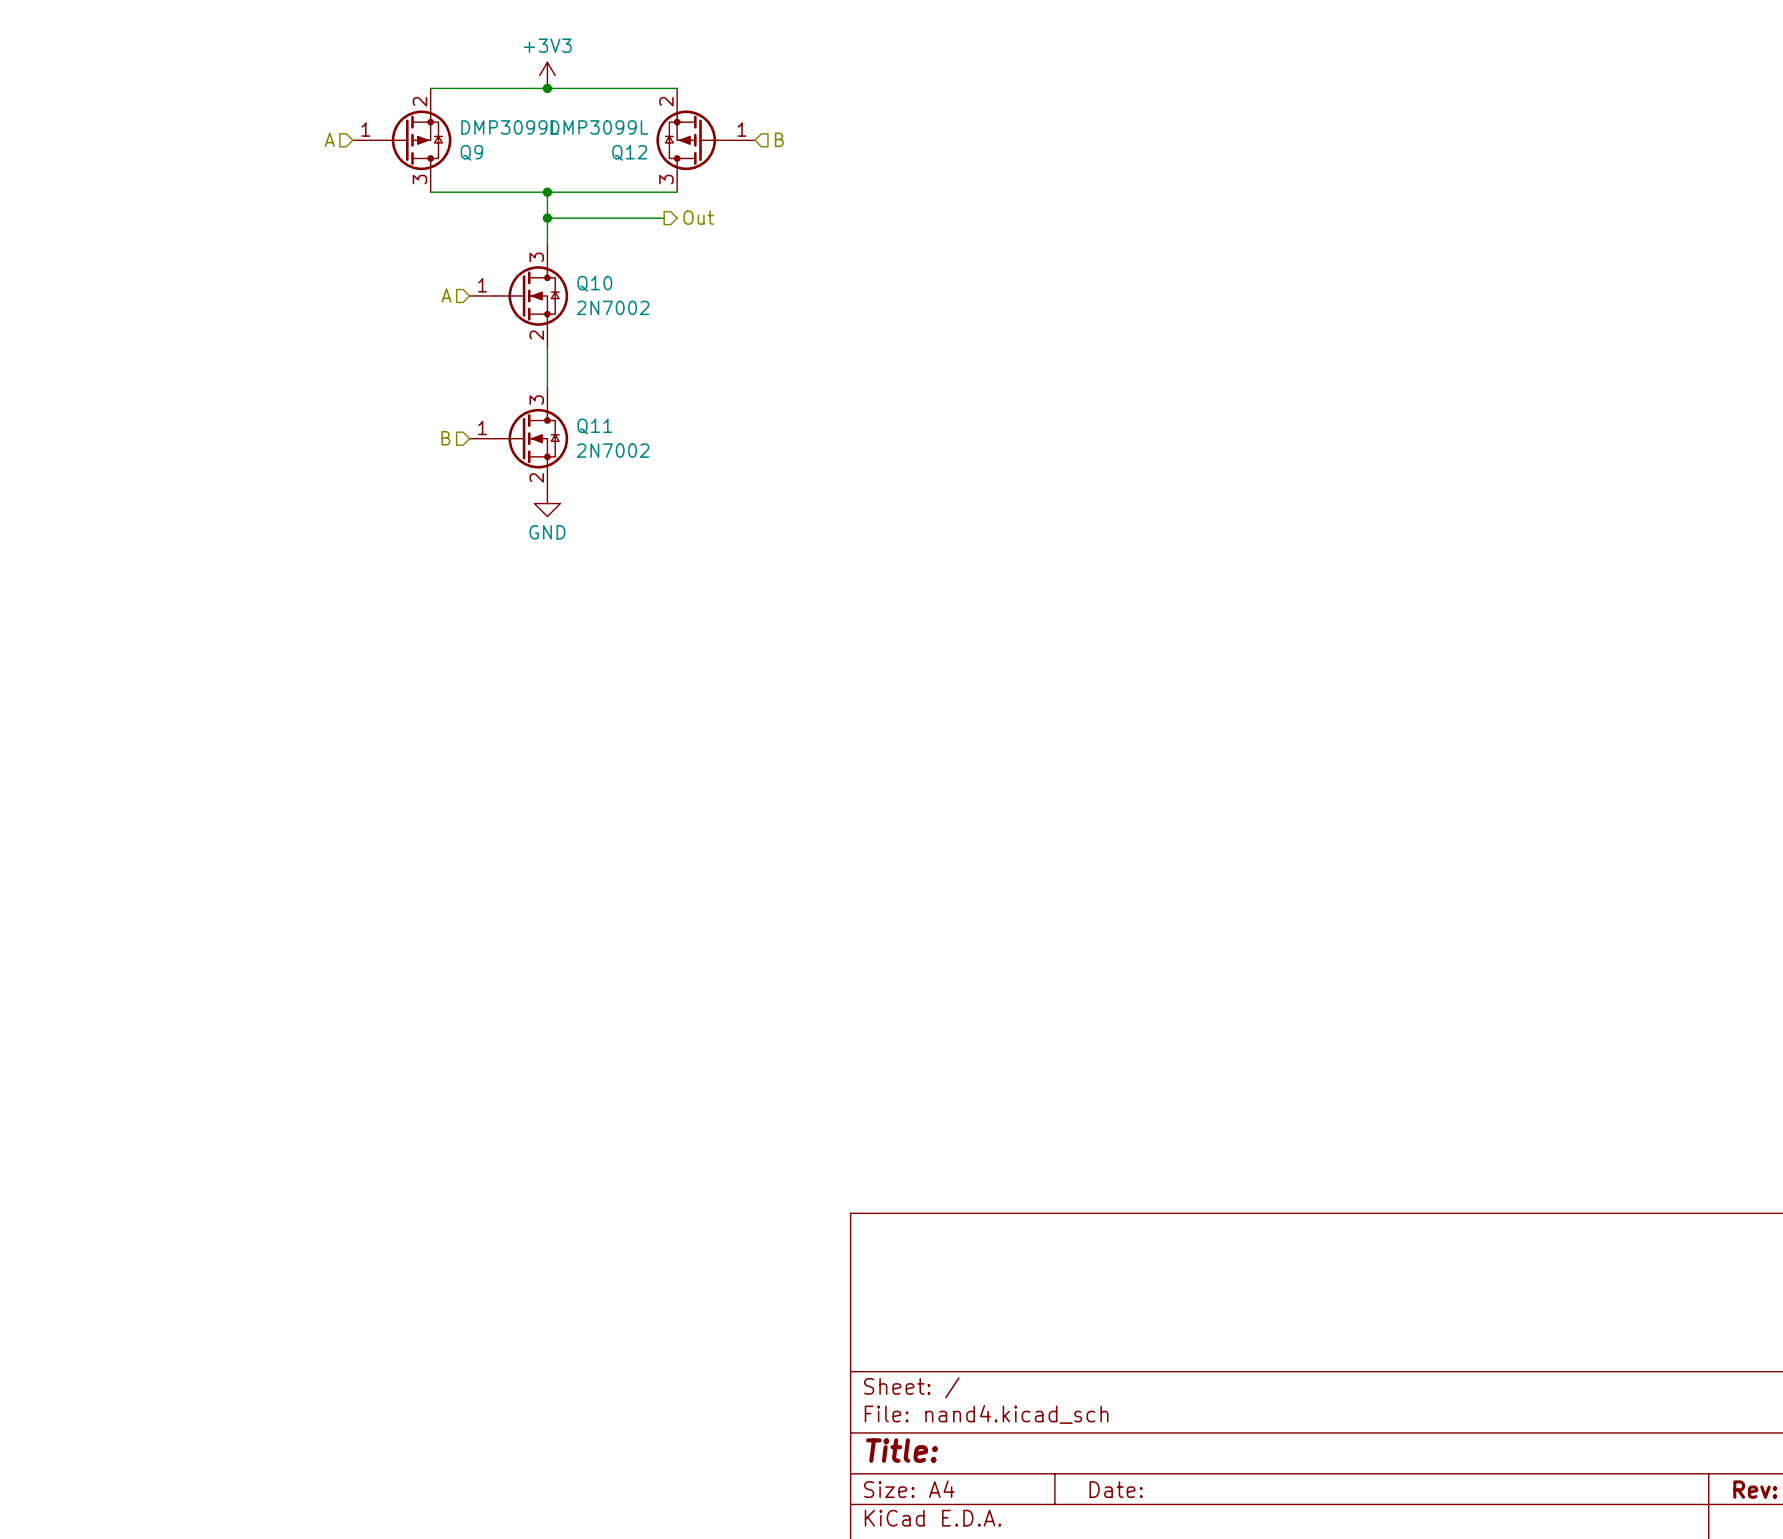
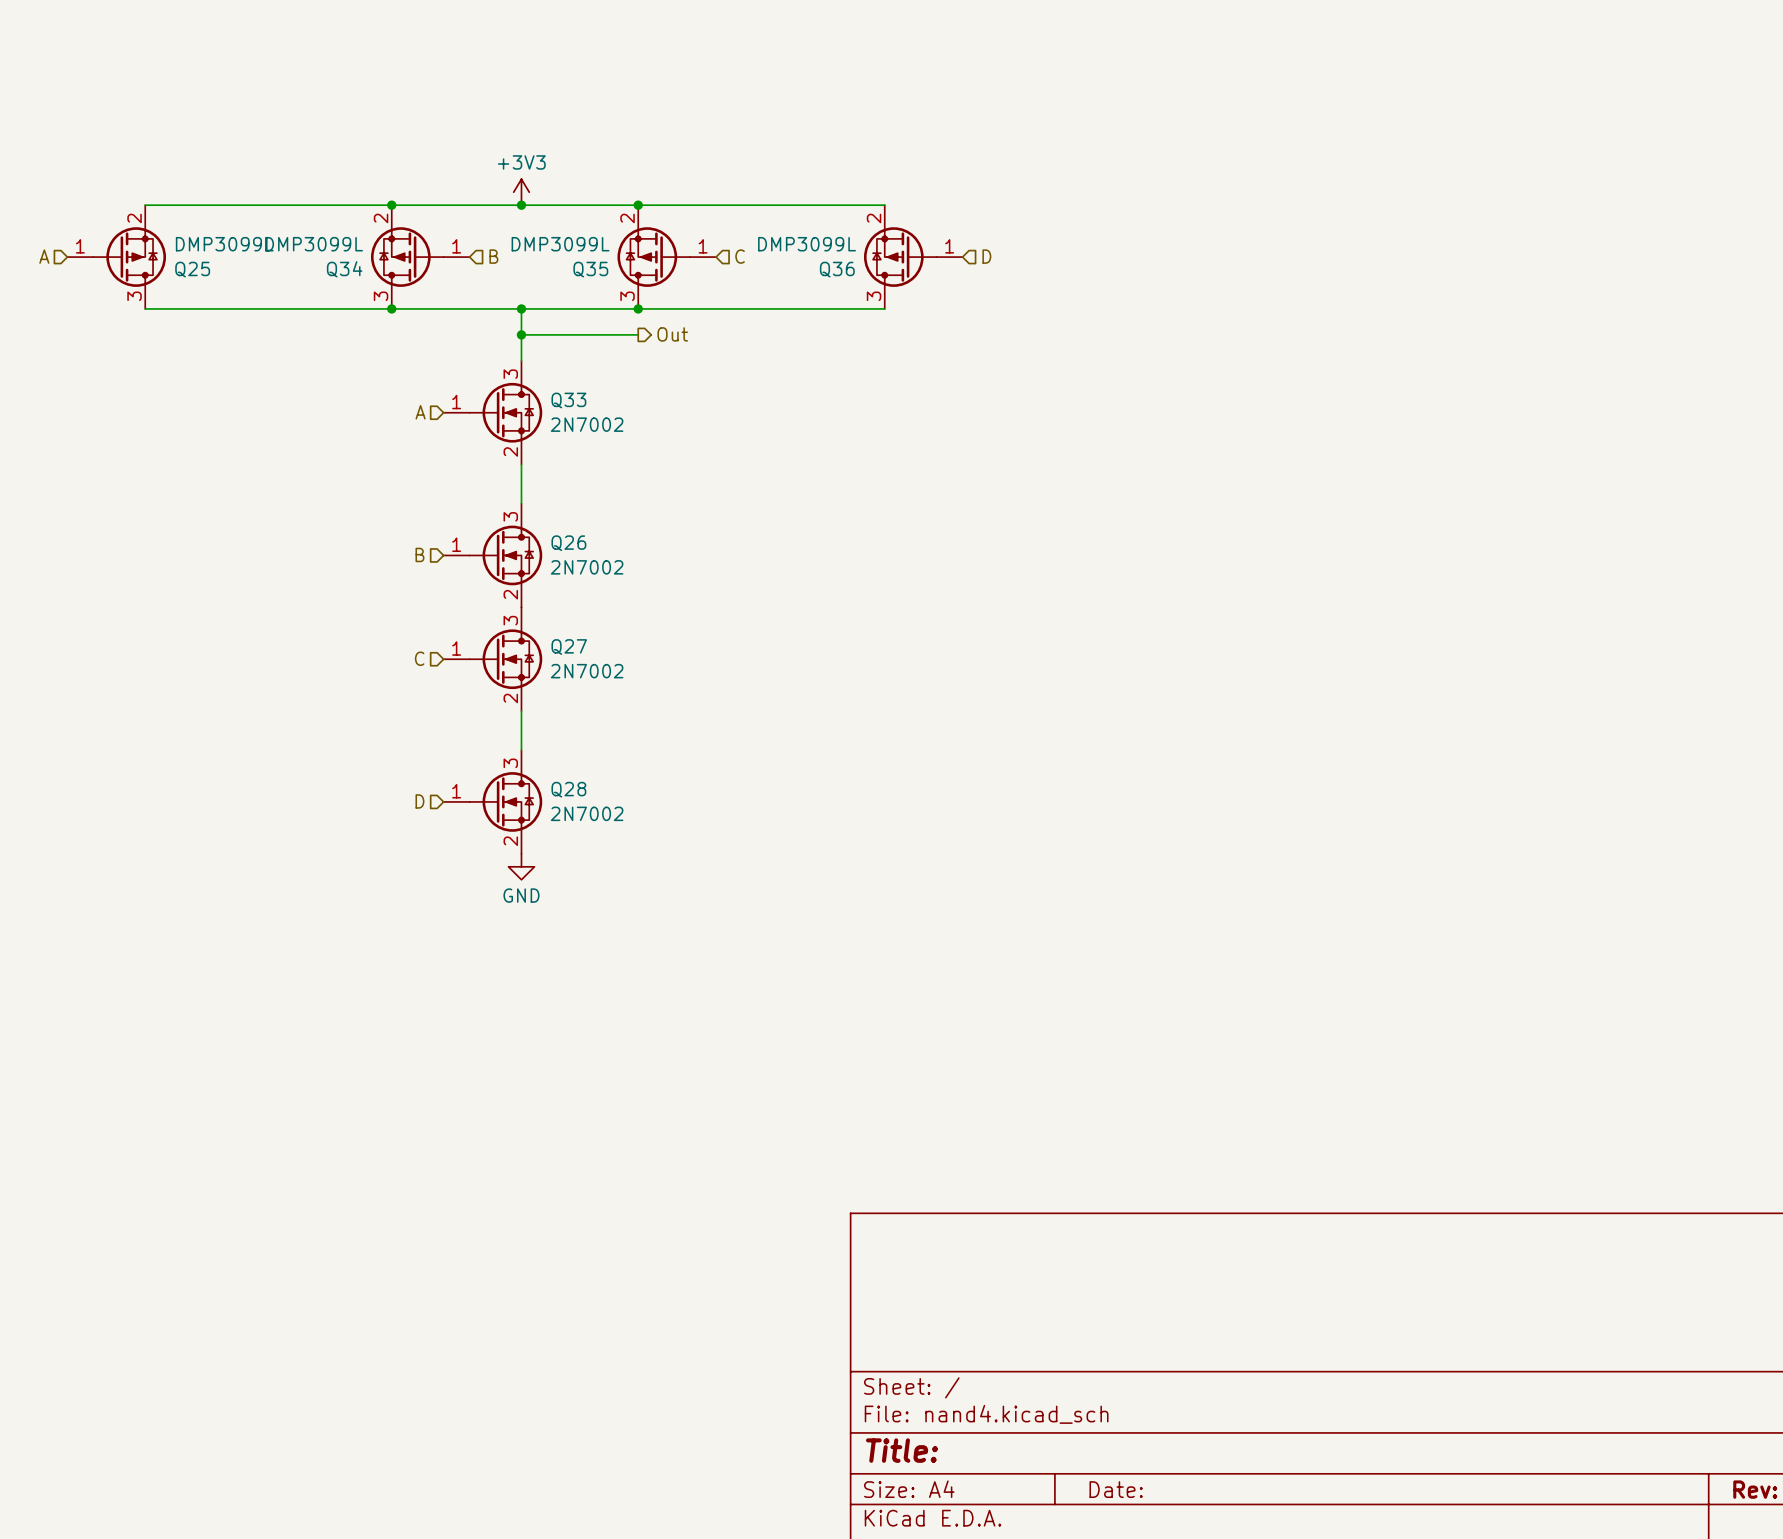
power symbol position: +3V3 (547, 75) -> +3V3 (521, 192)
wire: (430, 88) (677, 88) -> none
junction: (547, 88) -> none
hierarchical label: A (329, 139) -> none
hierarchical label: B (779, 139) -> none
Q9: DMP3099L (402, 140) -> none
Q12: DMP3099L (705, 140) -> none
wire: (430, 192) (677, 192) -> none
wire: (547, 192) (547, 244) -> (521, 308) (521, 360)
junction: (547, 192) -> none
wire: none -> (145, 205) (884, 205)
junction: none -> (391, 205)
junction: none -> (521, 205)
junction: none -> (638, 205)
hierarchical label position: Out (698, 217) -> Out (672, 334)
wire: (547, 218) (664, 218) -> (521, 334) (638, 334)
junction: (547, 218) -> none
hierarchical label: none -> A (44, 256)
hierarchical label: none -> B (493, 256)
hierarchical label: none -> C (740, 256)
hierarchical label: none -> D (986, 256)
Q25: none -> DMP3099L (116, 257)
Q34: none -> DMP3099L (420, 257)
Q35: none -> DMP3099L (666, 257)
Q36: none -> DMP3099L (913, 257)
hierarchical label position: A (446, 295) -> A (420, 412)
Q10: 2N7002 (518, 295) -> none
wire: none -> (145, 308) (884, 308)
junction: none -> (391, 308)
junction: none -> (521, 308)
junction: none -> (638, 308)
junction: none -> (521, 334)
wire: (547, 347) (547, 386) -> (521, 464) (521, 503)
Q33: none -> 2N7002 (492, 412)
hierarchical label: B (445, 438) -> none
Q11: 2N7002 (518, 438) -> none
power symbol: GND (547, 503) -> none
hierarchical label: none -> B (419, 554)
Q26: none -> 2N7002 (492, 555)
hierarchical label: none -> C (419, 658)
Q27: none -> 2N7002 (492, 659)
wire: none -> (521, 711) (521, 750)
hierarchical label: none -> D (419, 801)
Q28: none -> 2N7002 (492, 801)
power symbol: none -> GND (521, 866)

